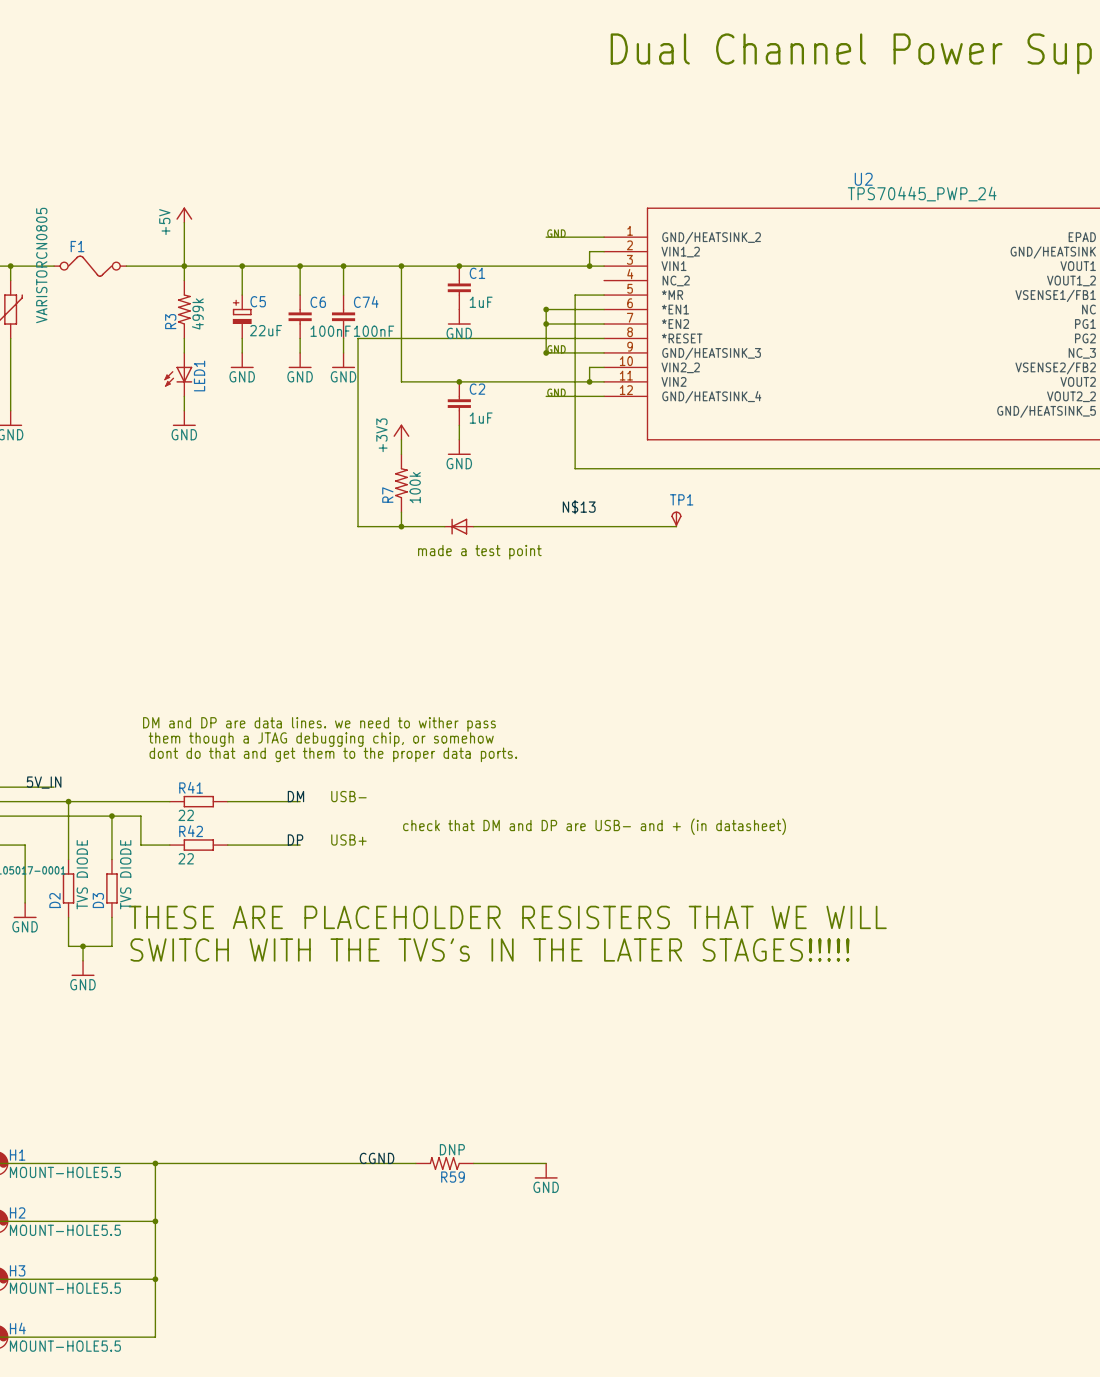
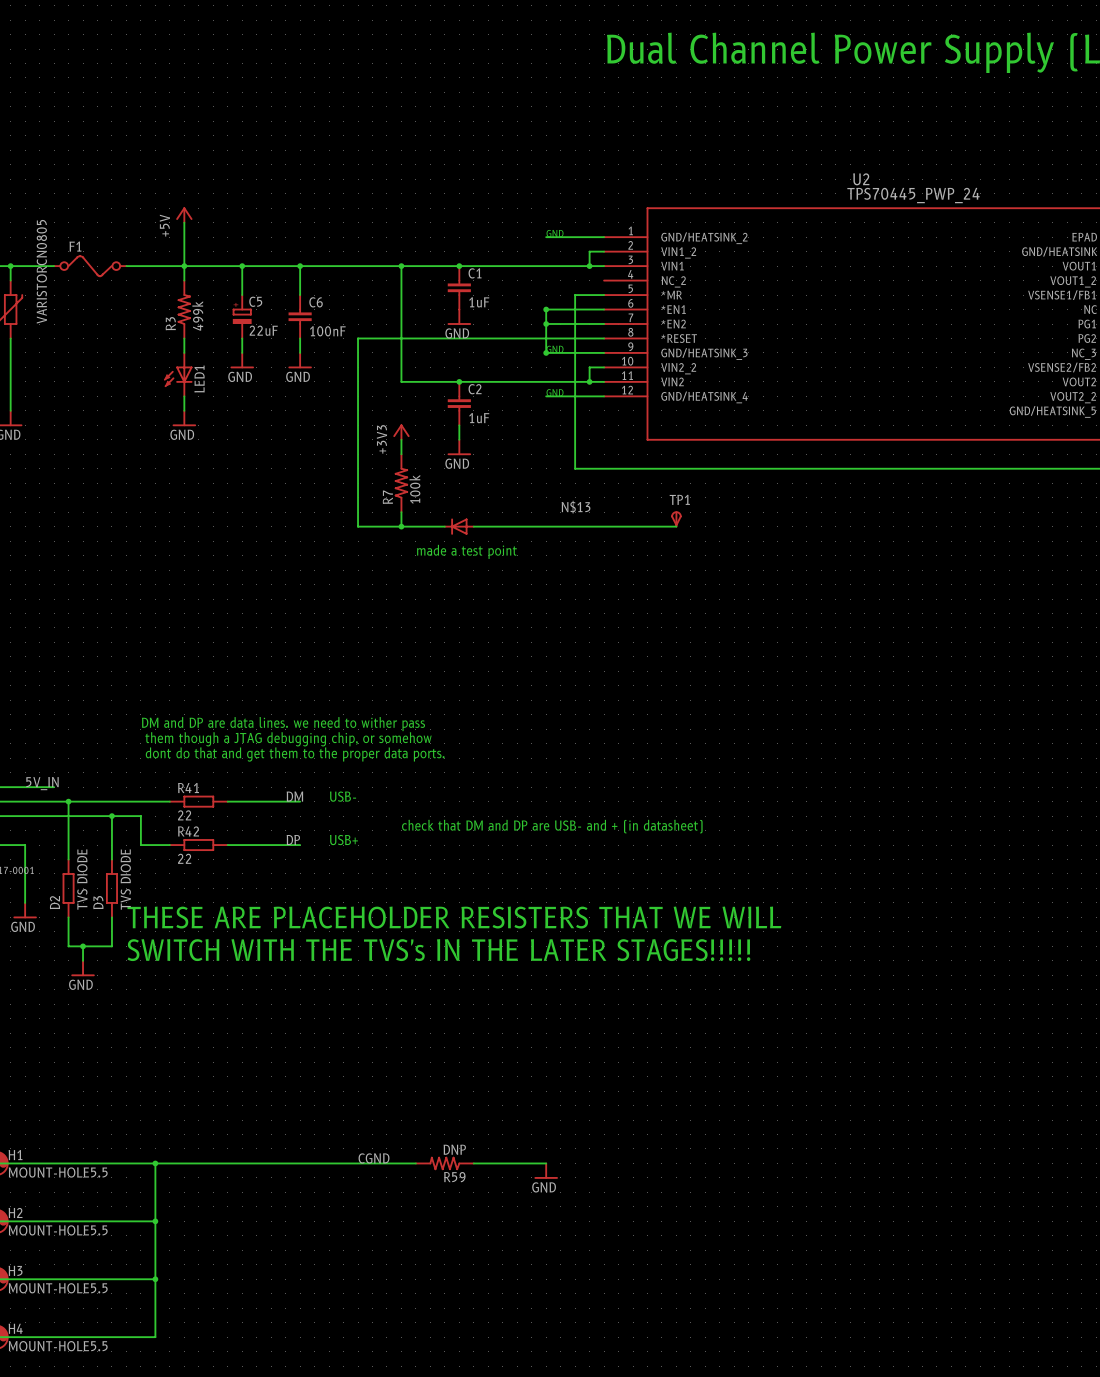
wire: (343, 266) (343, 295) -> none
junction: (343, 266) -> none
C74: 100nF (343, 316) -> none
wire: (343, 338) (343, 352) -> none
power symbol: GND (343, 360) -> none

